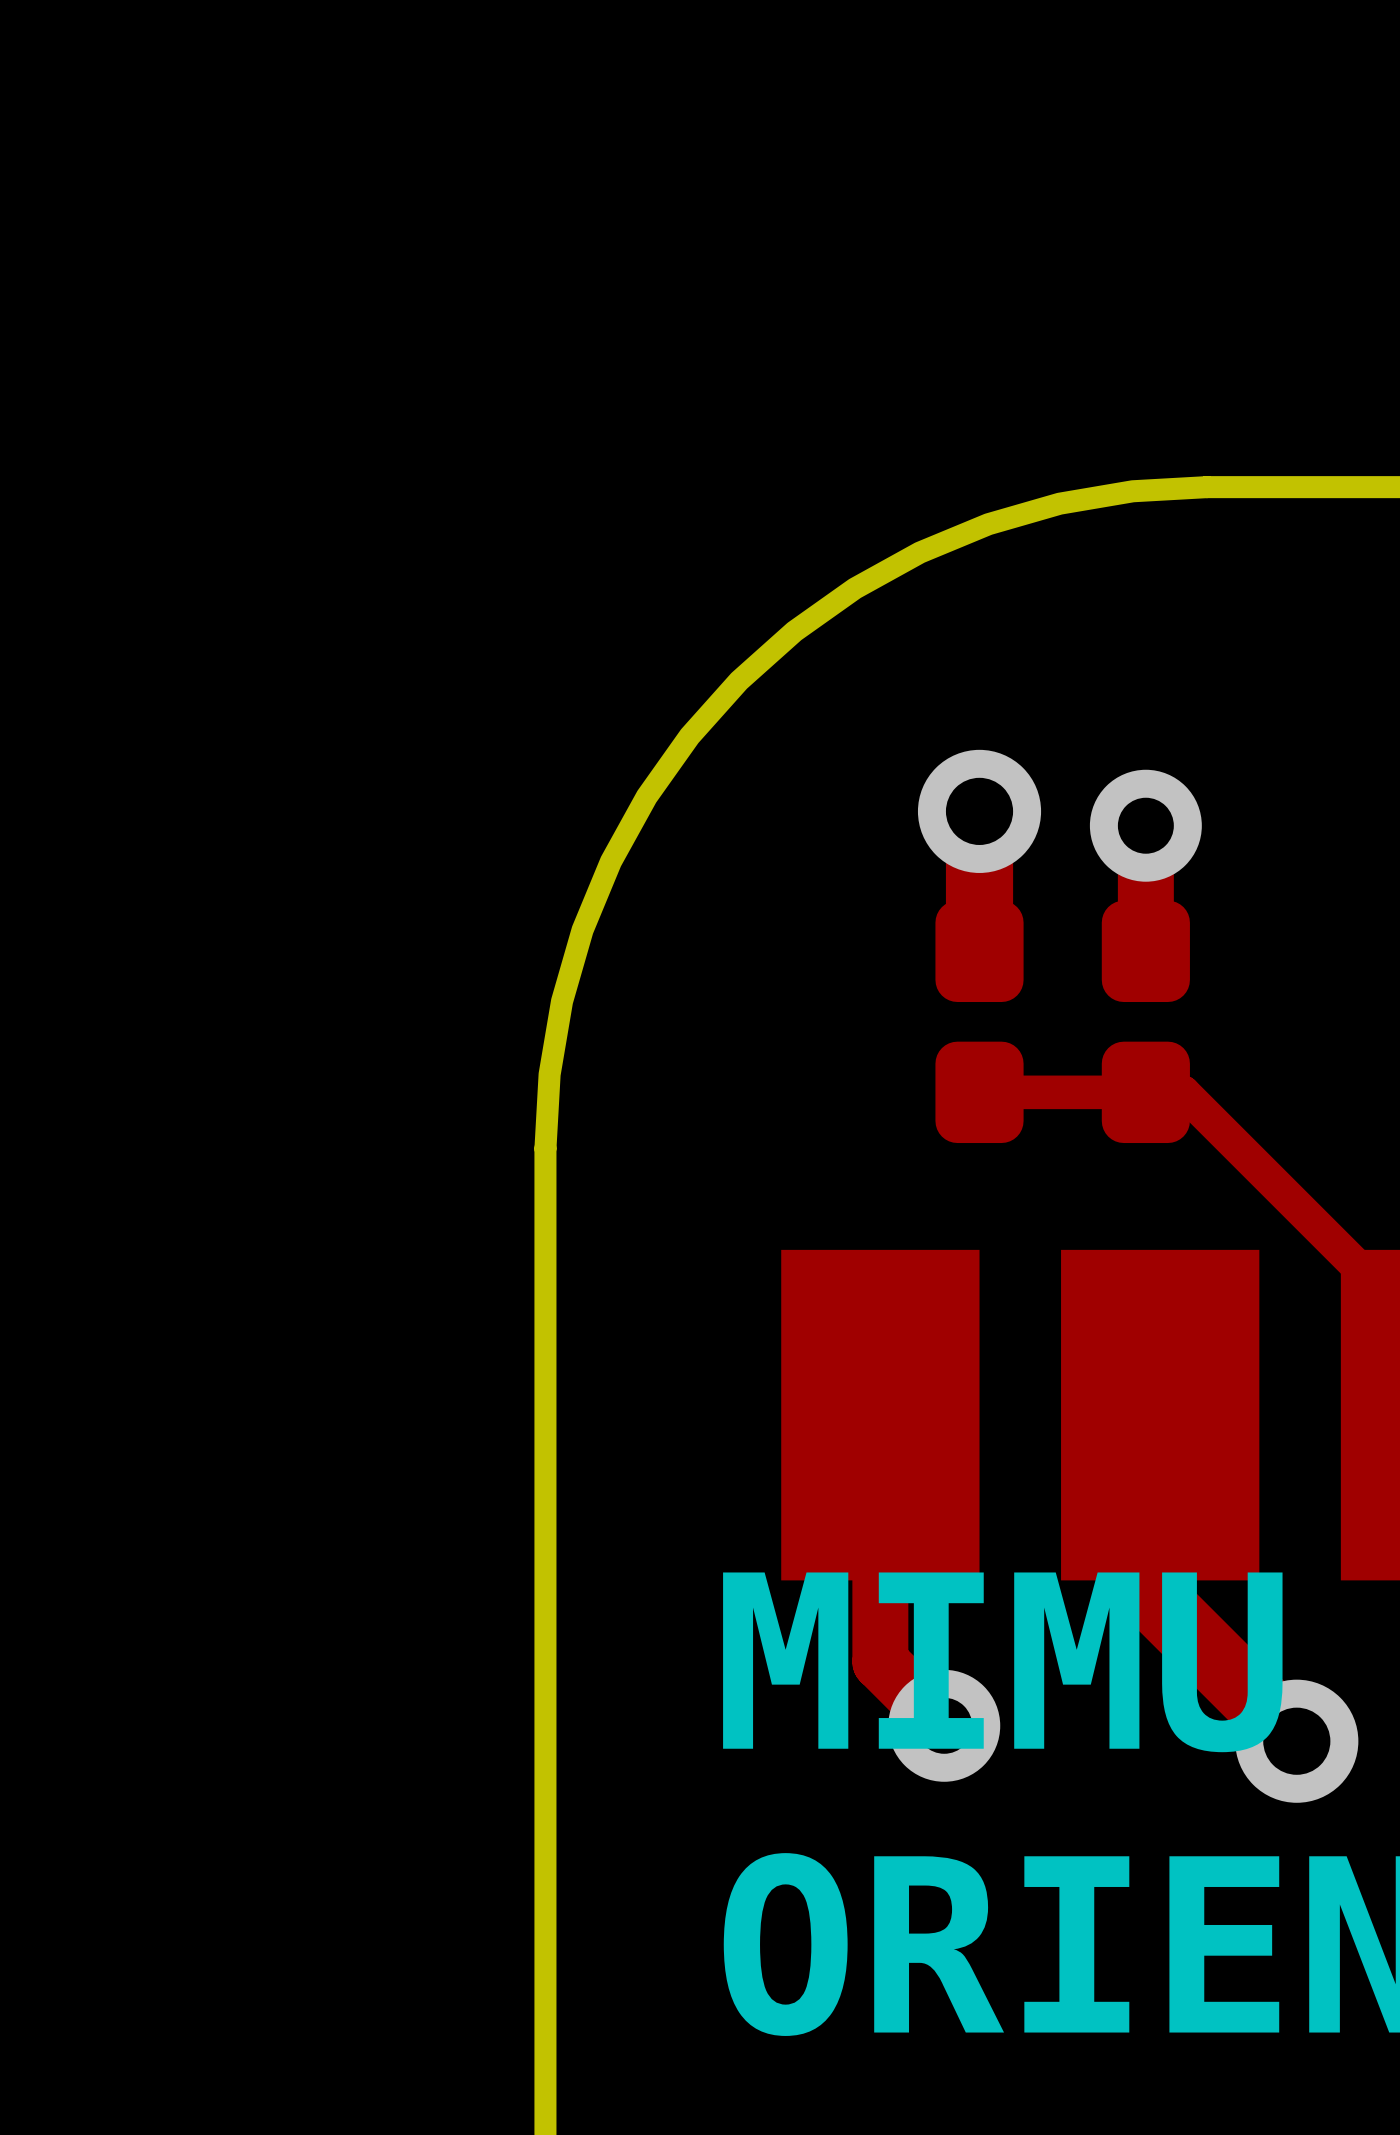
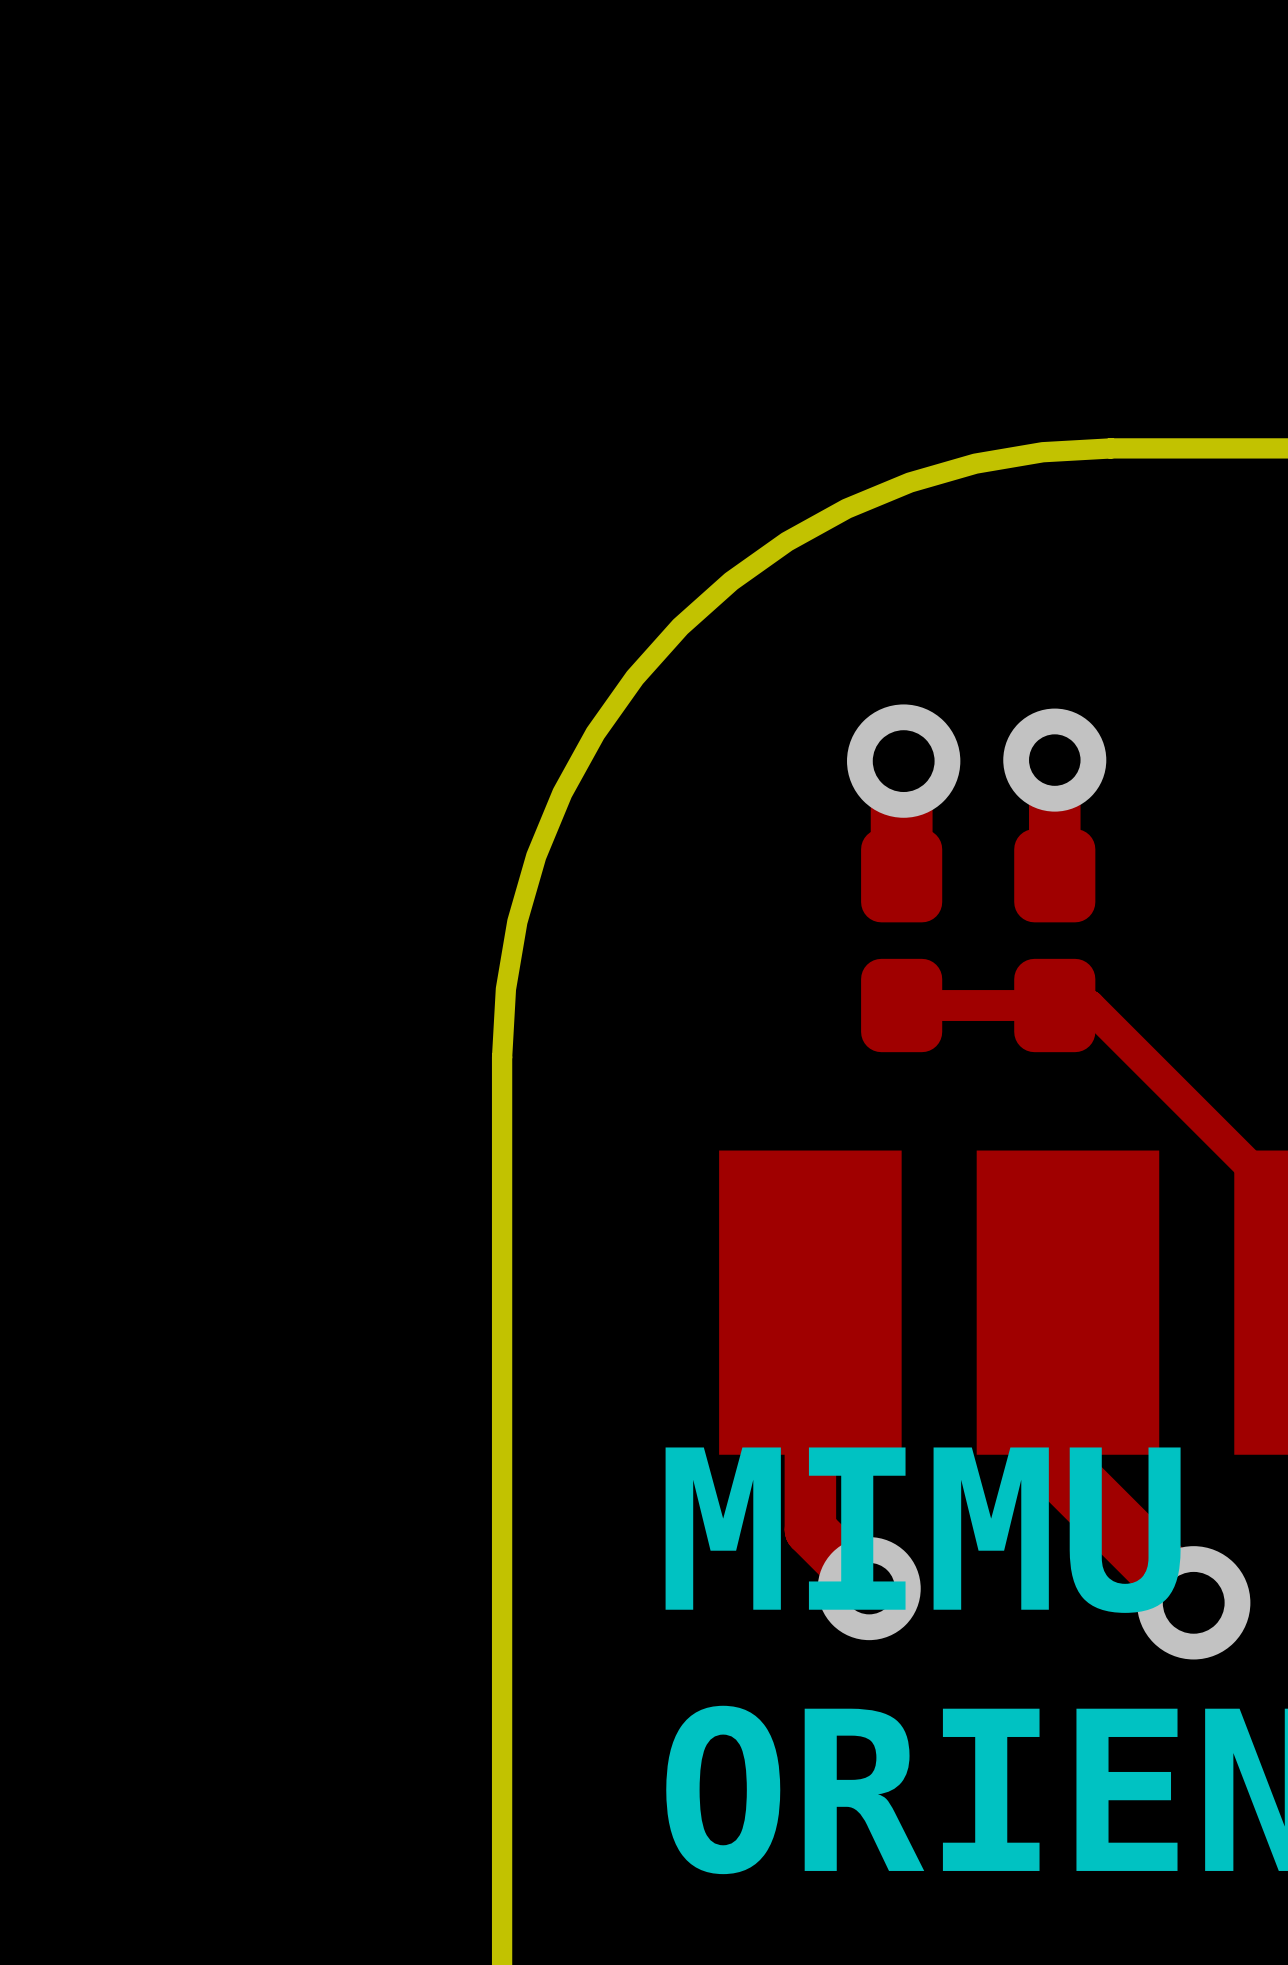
via position: (979, 811) -> (903, 761)

